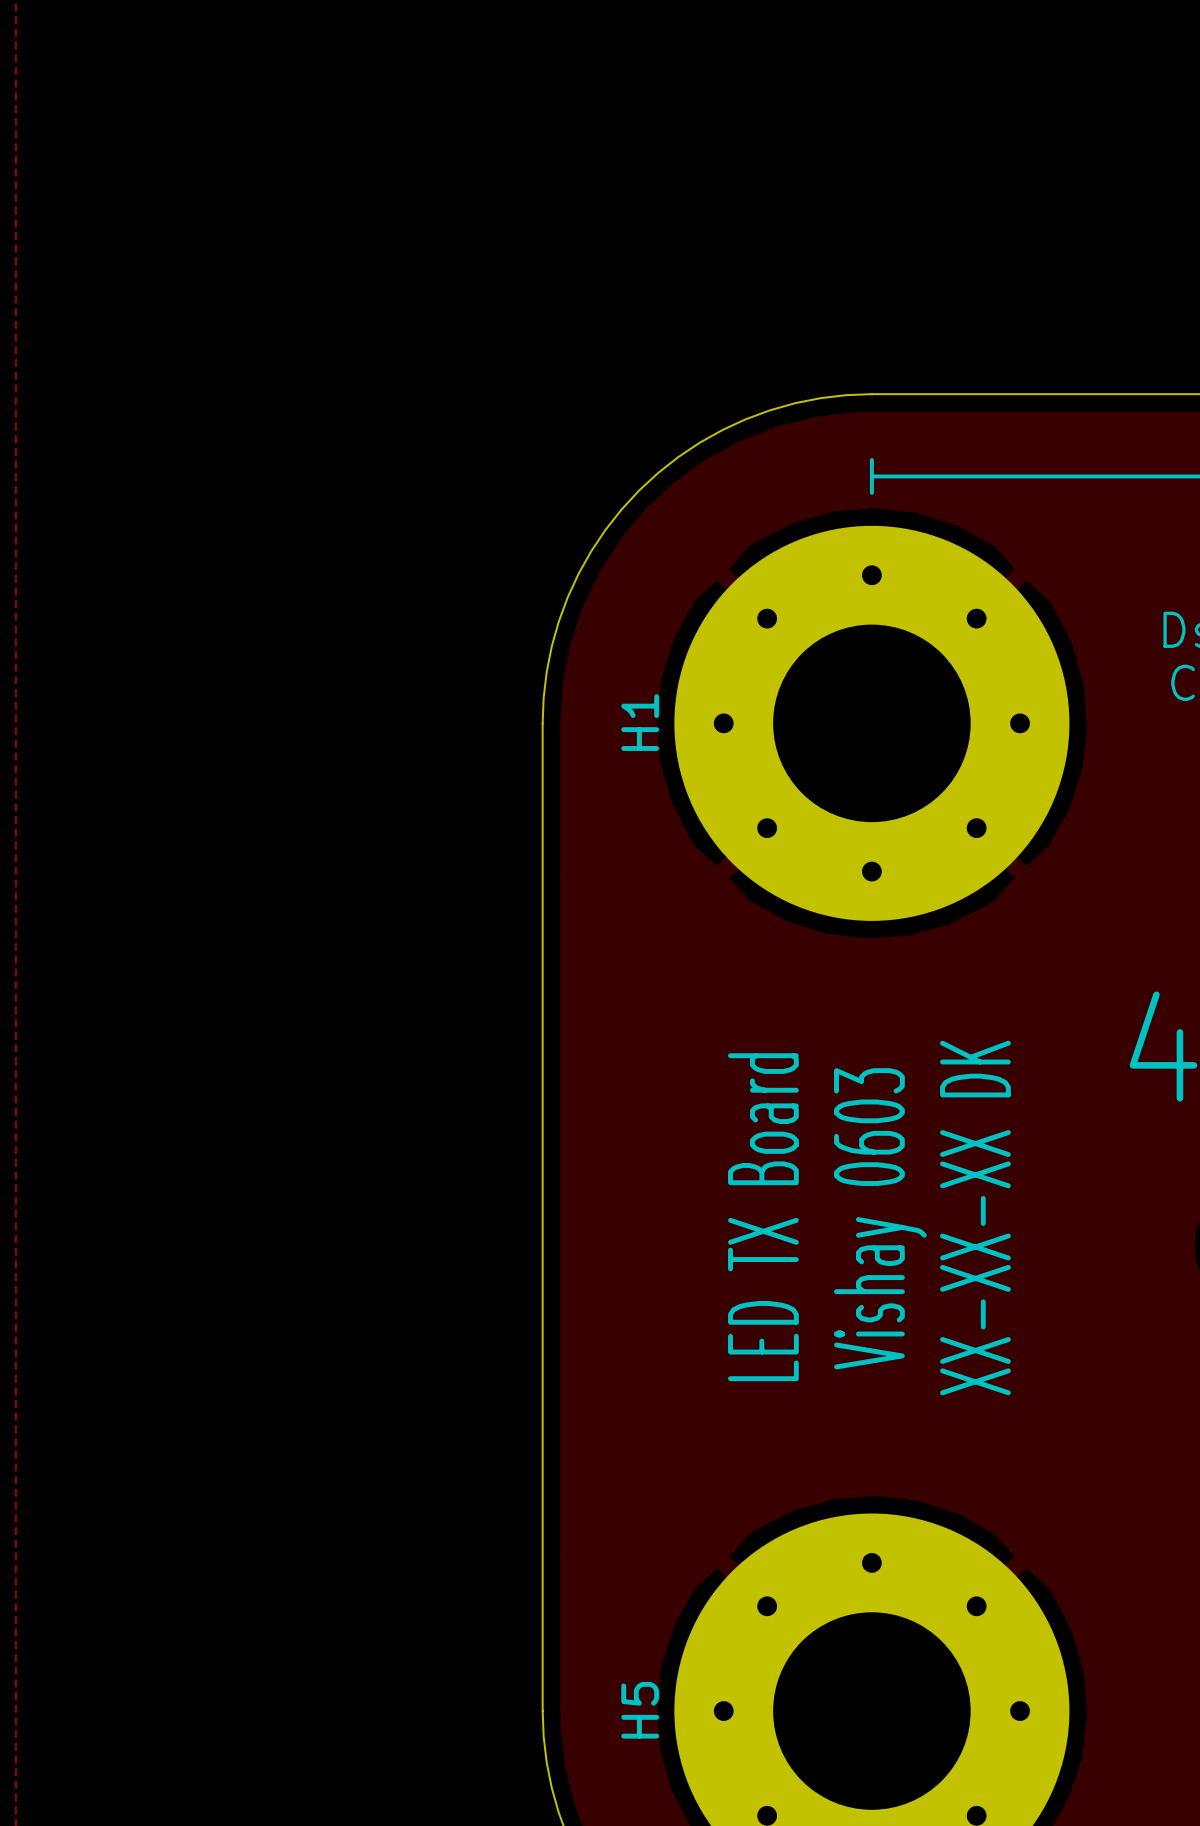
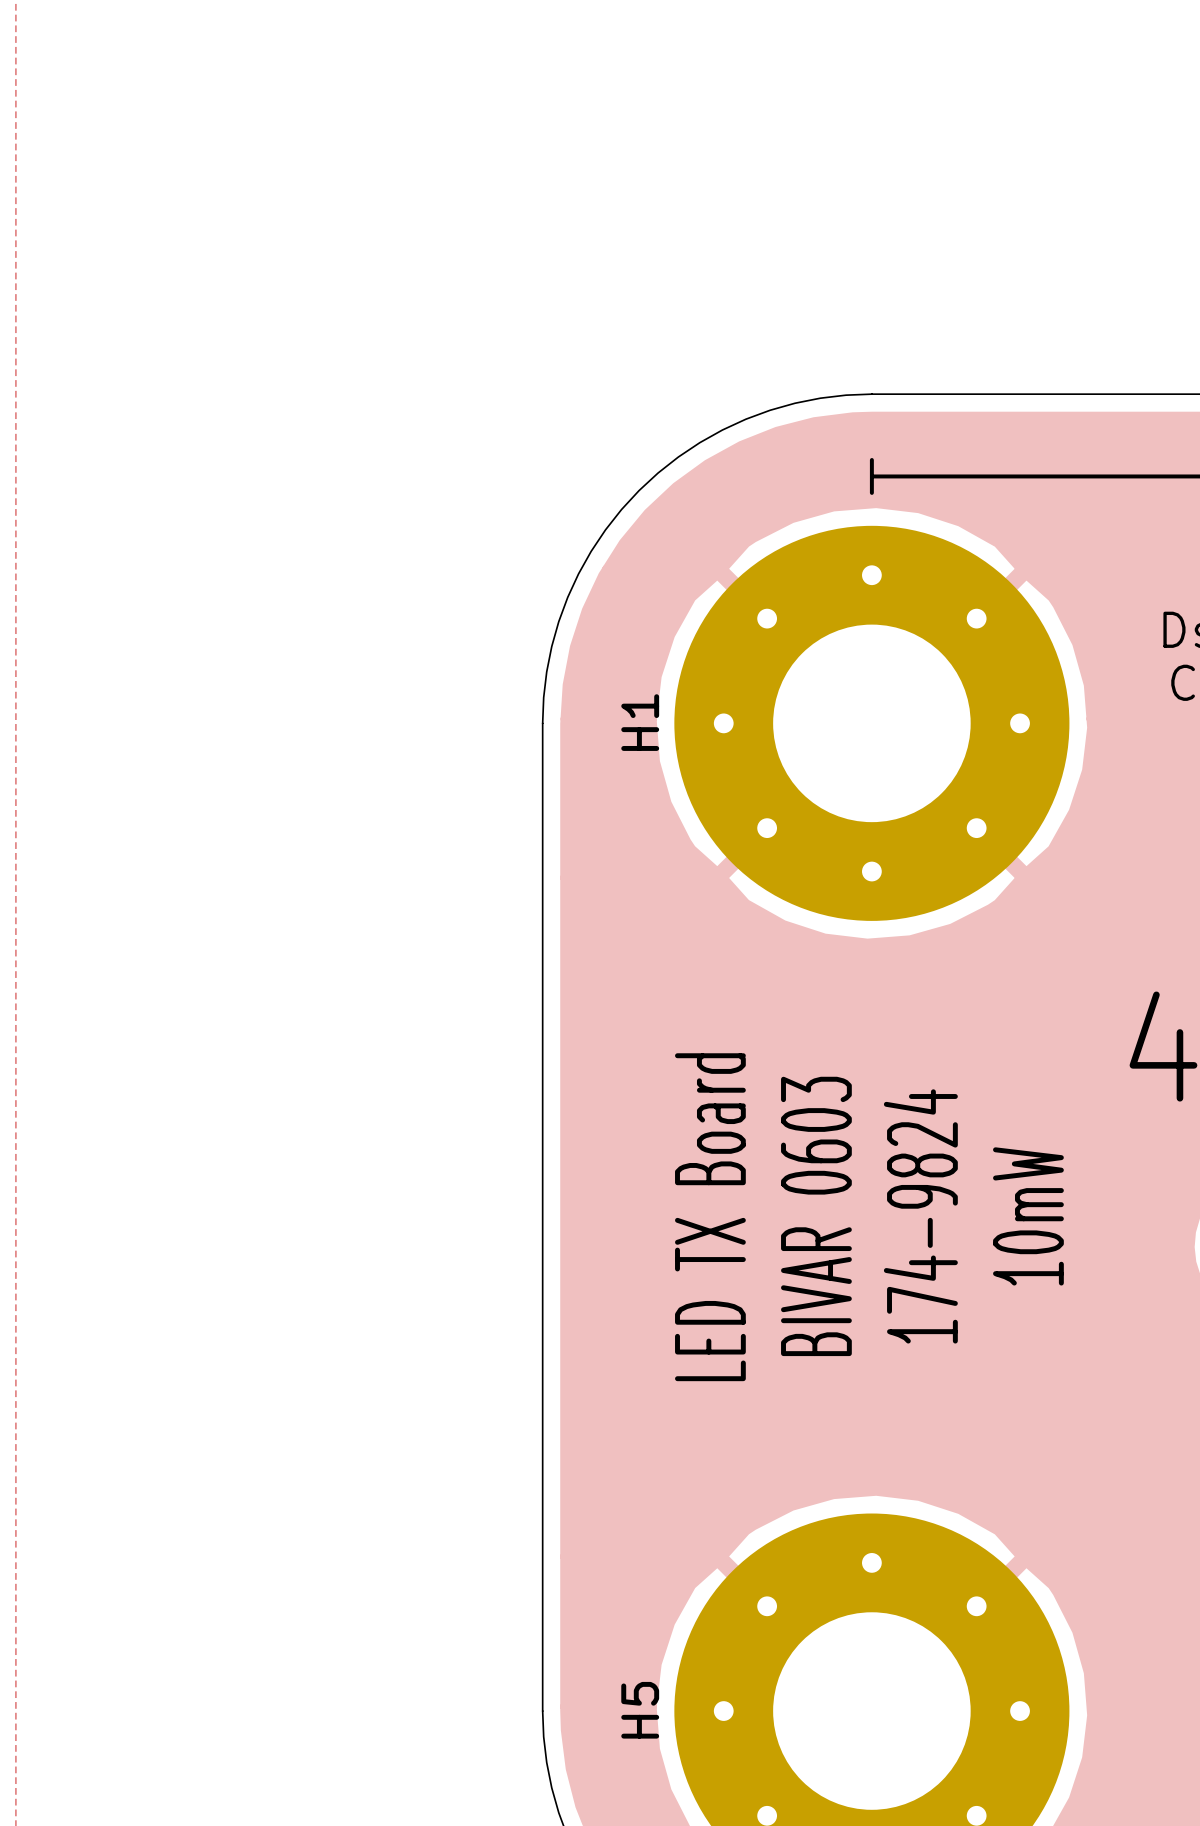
text: none -> BIVAR 0603 (816, 1216)
text: none -> 174-9824 (920, 1216)
text: none -> 10mW (1028, 1216)
text position: LED TX Board (763, 1217) -> LED TX Board (710, 1217)
text: XX-XX-XX DK (975, 1217) -> none
text: Vishay 0603 (880, 1218) -> none

